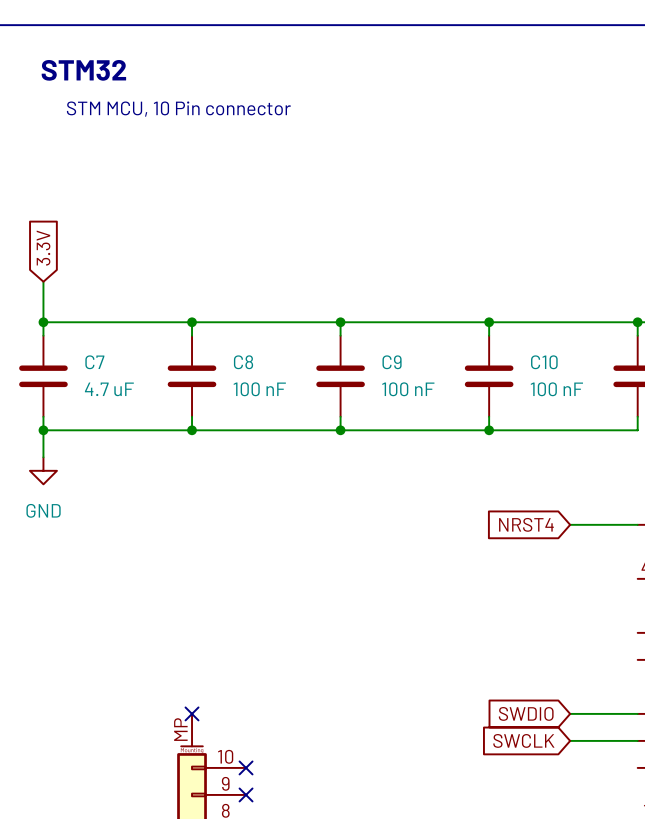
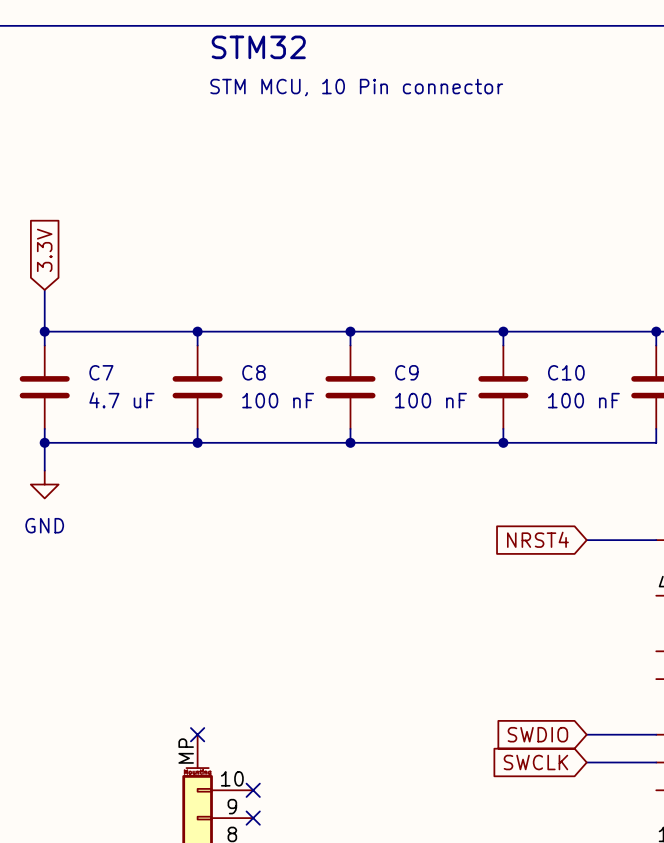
text position: STM32 (83, 70) -> STM32 (258, 47)
text position: STM MCU, 10 Pin connector (178, 109) -> STM MCU, 10 Pin connector (356, 87)

